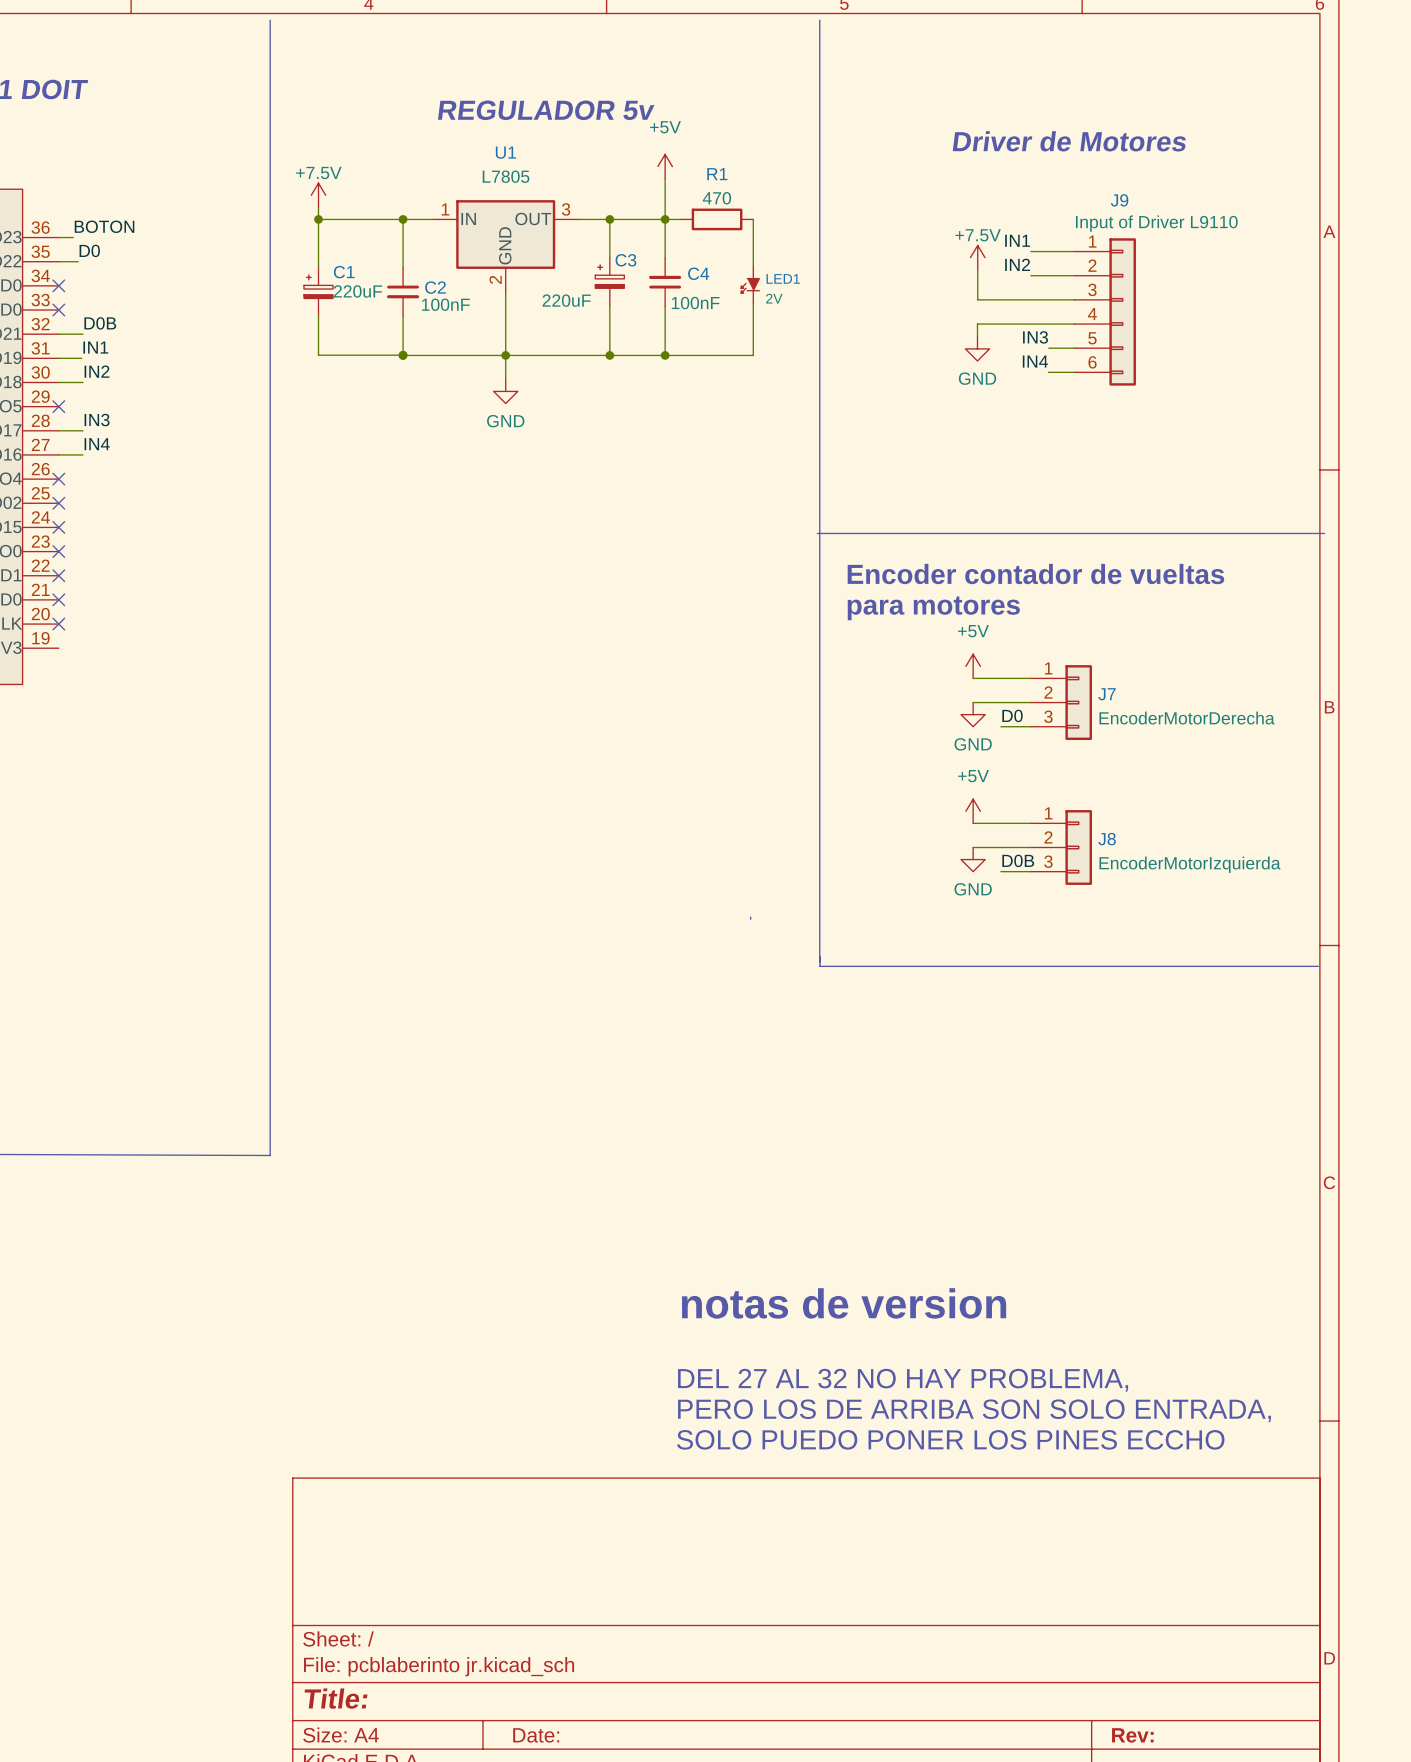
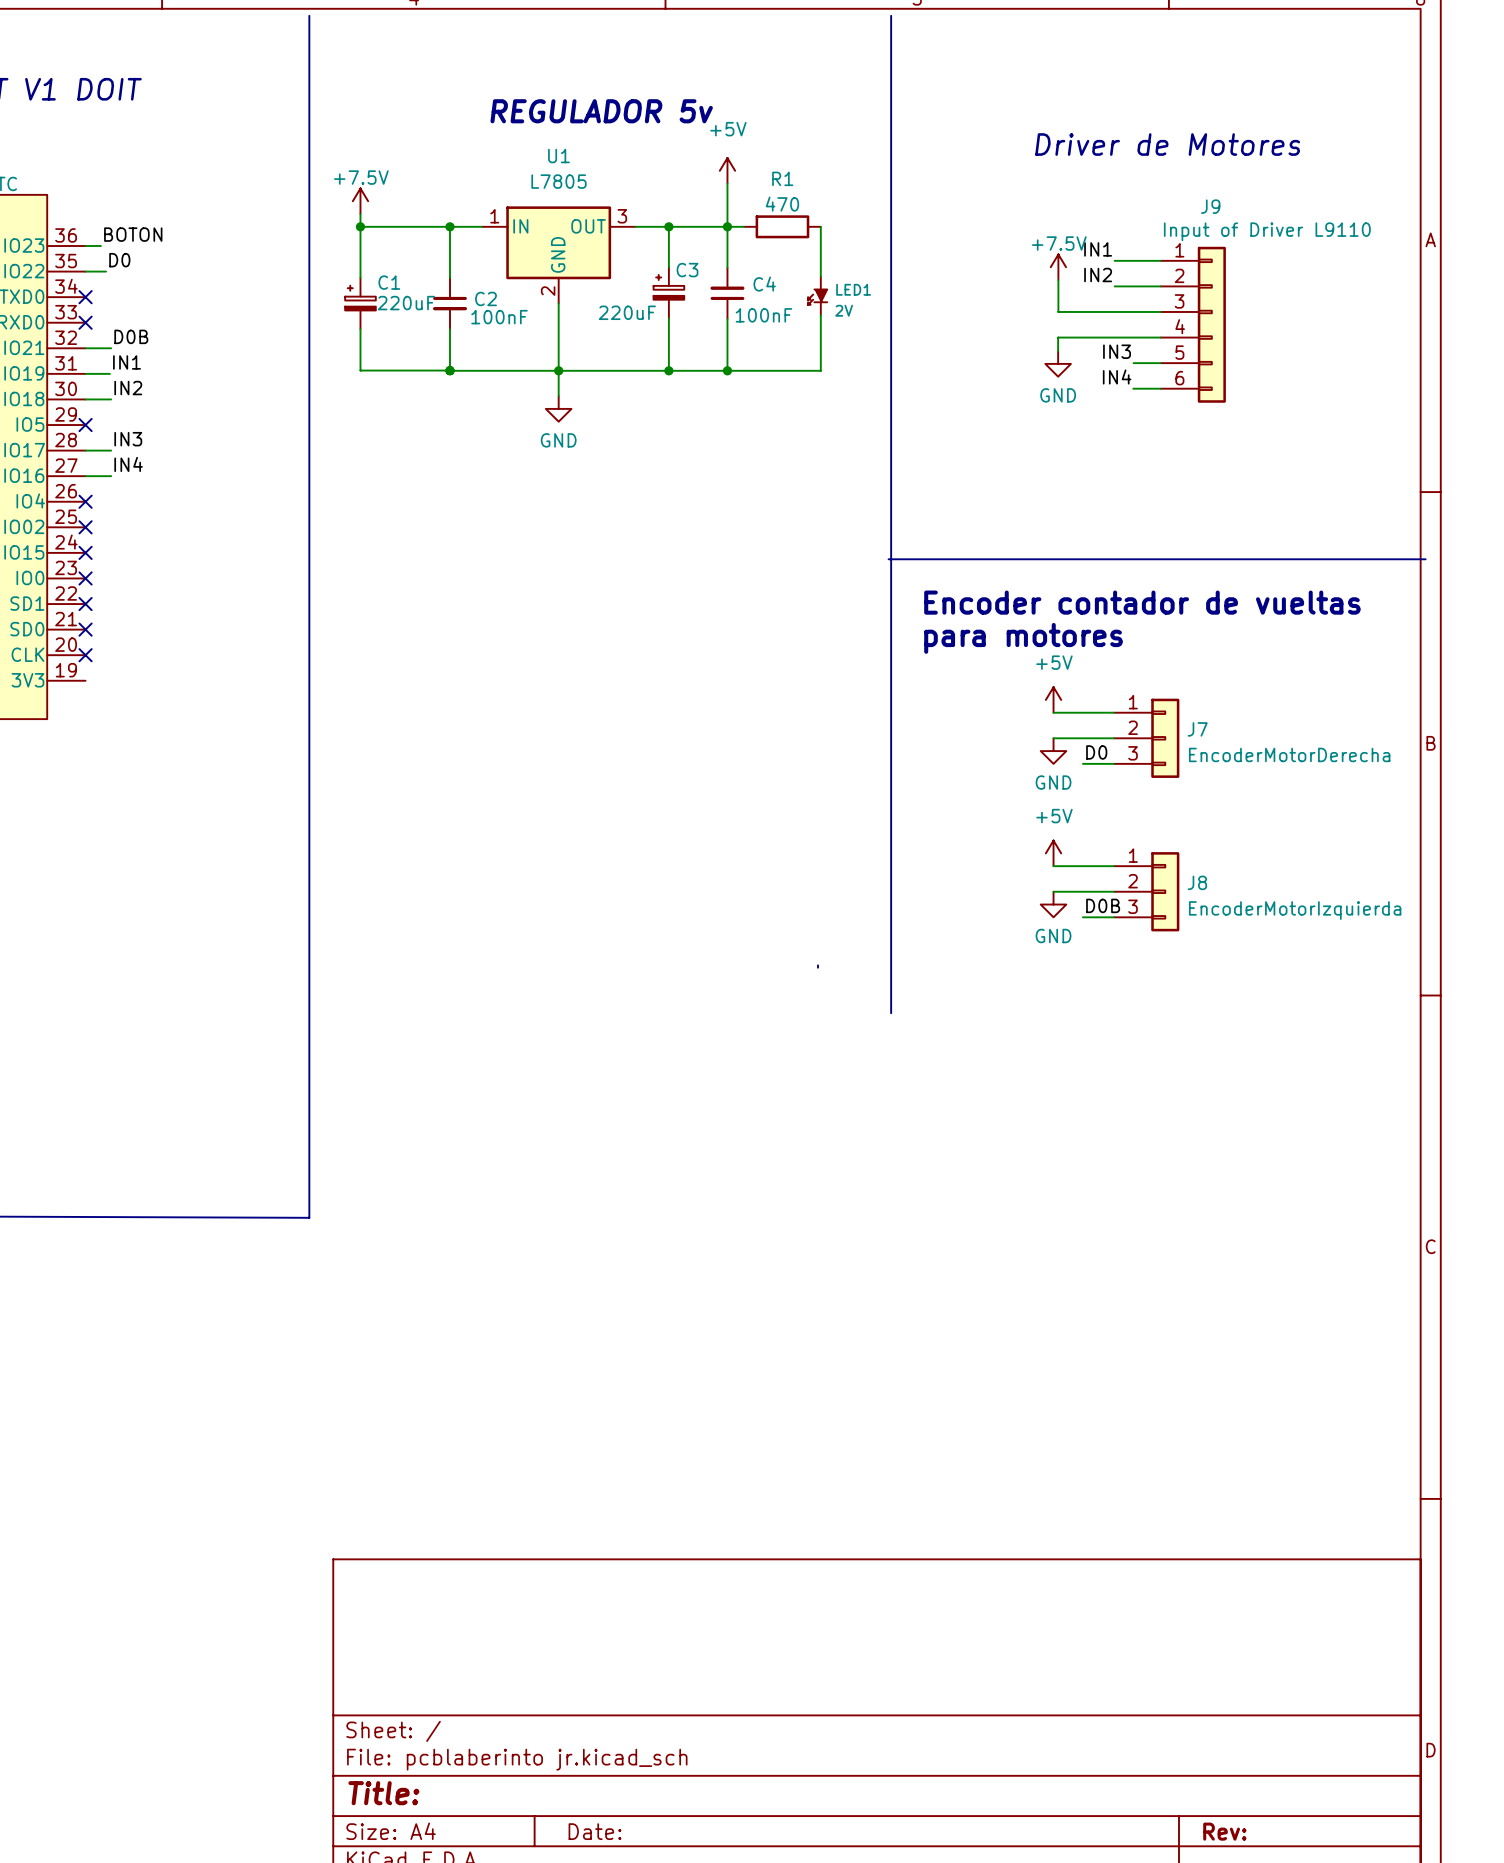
line: (819, 956) (819, 966) (1318, 966) -> none
text: notas de version (844, 1303) -> none
text: DEL 27 AL 32 NO HAY PROBLEMA, (903, 1380) -> none
text: PERO LOS DE ARRIBA SON SOLO ENTRADA, (974, 1410) -> none
text: SOLO PUEDO PONER LOS PINES ECCHO (950, 1439) -> none

